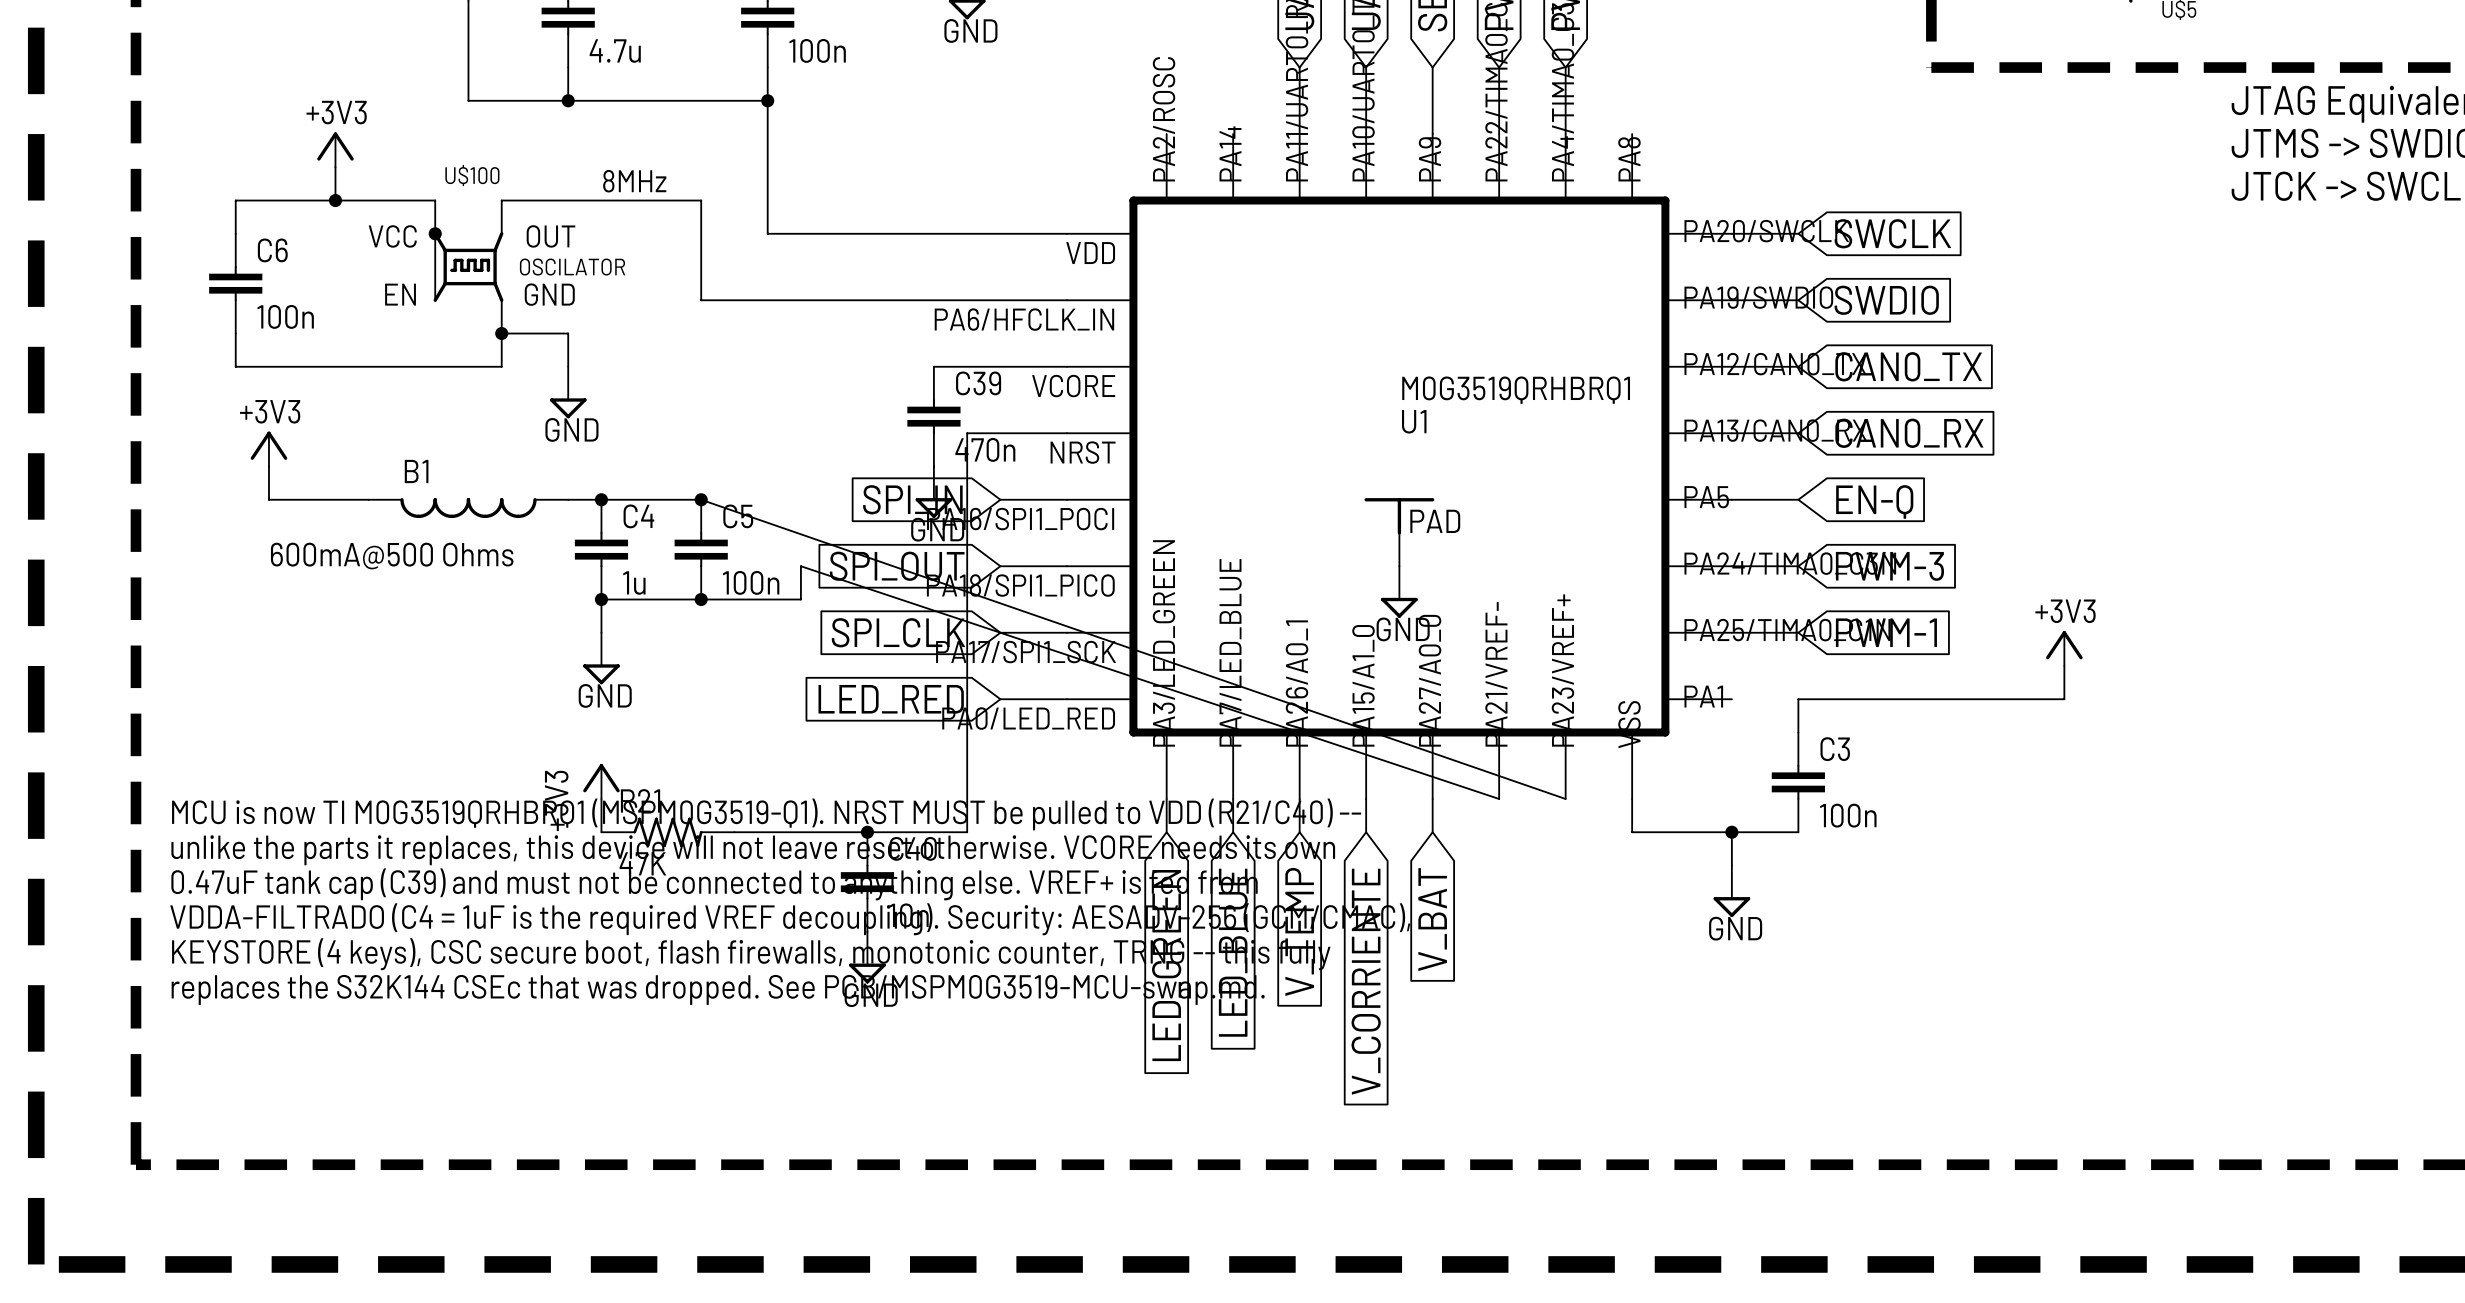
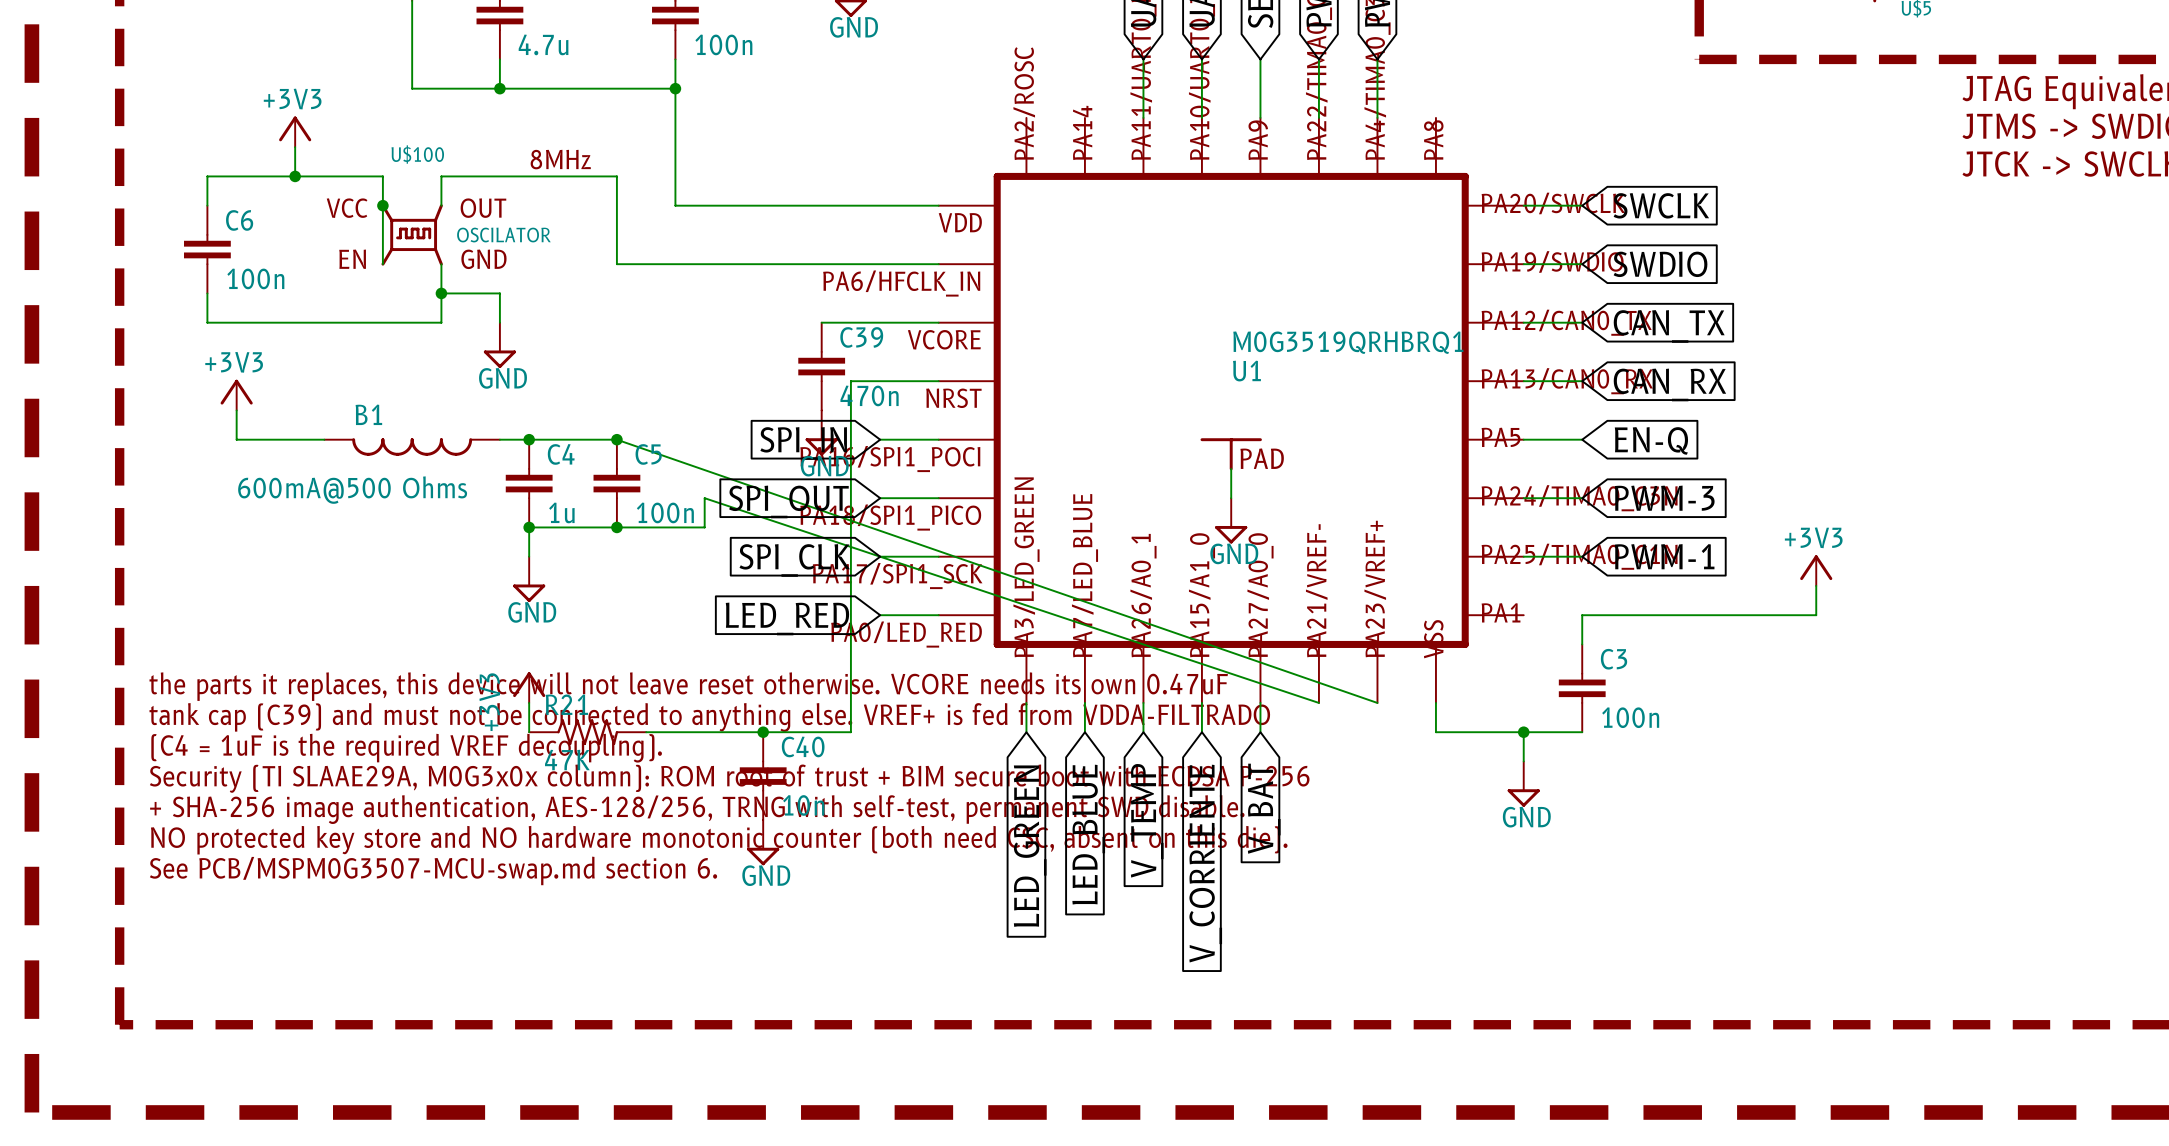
global label: CAN0_TX (1908, 366) -> CAN_TX (1669, 326)
global label: CAN0_RX (1909, 433) -> CAN_RX (1669, 384)
text: none -> the parts it replaces, this device will not leave reset otherwise. VCORE needs its own 0.47uF (688, 686)
text: MCU is now TI M0G3519QRHBRQ1 (MSPM0G3519-Q1). NRST MUST be pulled to VDD (R21/C40) -- (766, 814) -> tank cap (C39) and must not be connected to anything else. VREF+ is fed from VDDA-FILTRADO (709, 717)
text: unlike the parts it replaces, this device will not leave reset otherwise. VCORE needs its own (753, 850) -> (C4 = 1uF is the required VREF decoupling). (406, 748)
text: 0.47uF tank cap (C39) and must not be connected to anything else. VREF+ is fed from (714, 884) -> Security (TI SLAAE29A, M0G3x0x column): ROM root of trust + BIM secure boot with ECDSA P-256 (729, 778)
text: VDDA-FILTRADO (C4 = 1uF is the required VREF decoupling). Security: AESADV-256 (GCM/CMAC), (790, 919) -> + SHA-256 image authentication, AES-128/256, TRNG with self-test, permanent SWD disable. (697, 809)
text: KEYSTORE (4 keys), CSC secure boot, flash firewalls, monotonic counter, TRNG -- this fully (751, 954) -> NO protected key store and NO hardware monotonic counter (both need CSC, absent on this die). (719, 840)
text: replaces the S32K144 CSEc that was dropped. See PCB/MSPM0G3519-MCU-swap.md. (718, 989) -> See PCB/MSPM0G3507-MCU-swap.md section 6. (433, 870)

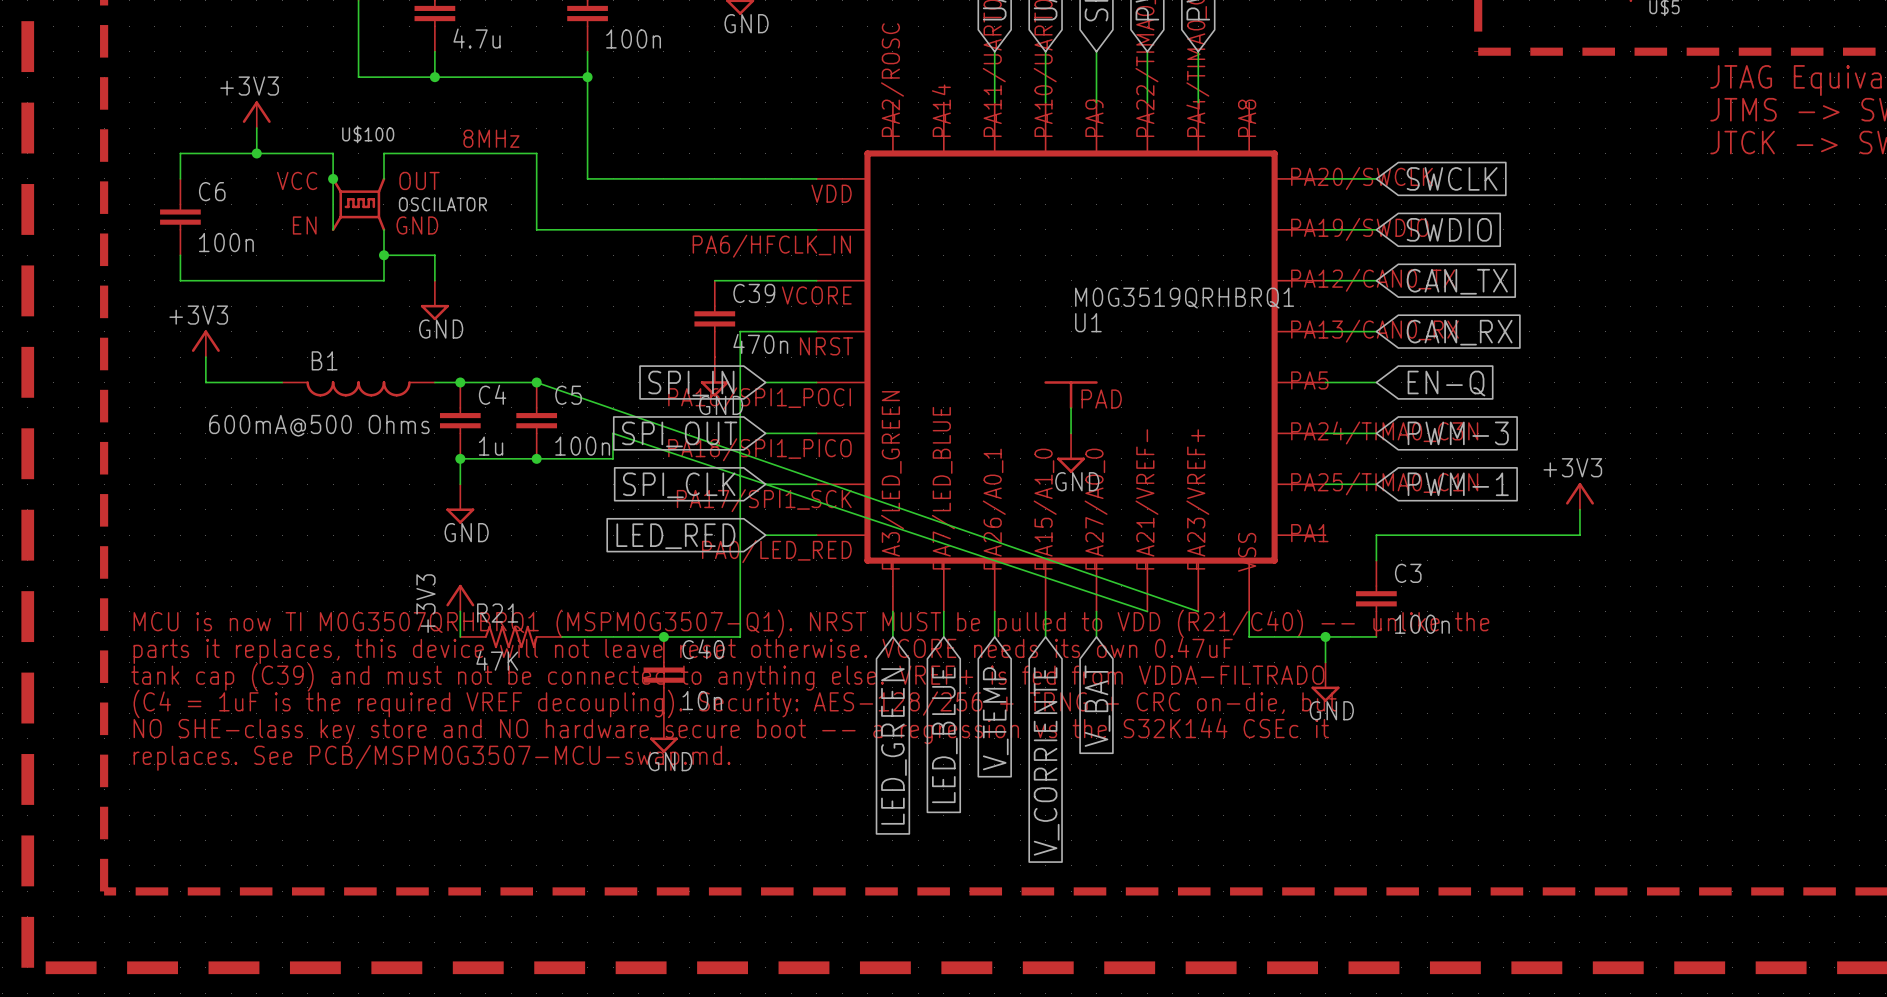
text: the parts it replaces, this device will not leave reset otherwise. VCORE needs its own 0.47uF (688, 686) -> none
text: tank cap (C39) and must not be connected to anything else. VREF+ is fed from VDDA-FILTRADO (709, 717) -> MCU is now TI M0G3507QRHBRQ1 (MSPM0G3507-Q1). NRST MUST be pulled to VDD (R21/C40) -- unlike the (811, 623)
text: (C4 = 1uF is the required VREF decoupling). (406, 748) -> parts it replaces, this device will not leave reset otherwise. VCORE needs its own 0.47uF (683, 650)
text: Security (TI SLAAE29A, M0G3x0x column): ROM root of trust + BIM secure boot with ECDSA P-256 (729, 778) -> tank cap (C39) and must not be connected to anything else. VREF+ is fed from VDDA-FILTRADO (727, 677)
text: + SHA-256 image authentication, AES-128/256, TRNG with self-test, permanent SWD disable. (697, 809) -> (C4 = 1uF is the required VREF decoupling). Security: AES-128/256 + TRNG + CRC on-die, but (735, 703)
text: NO protected key store and NO hardware monotonic counter (both need CSC, absent on this die). (719, 840) -> NO SHE-class key store and NO hardware secure boot -- a regression vs the S32K144 CSEc it (731, 731)
text: See PCB/MSPM0G3507-MCU-swap.md section 6. (433, 870) -> replaces. See PCB/MSPM0G3507-MCU-swap.md. (432, 757)

